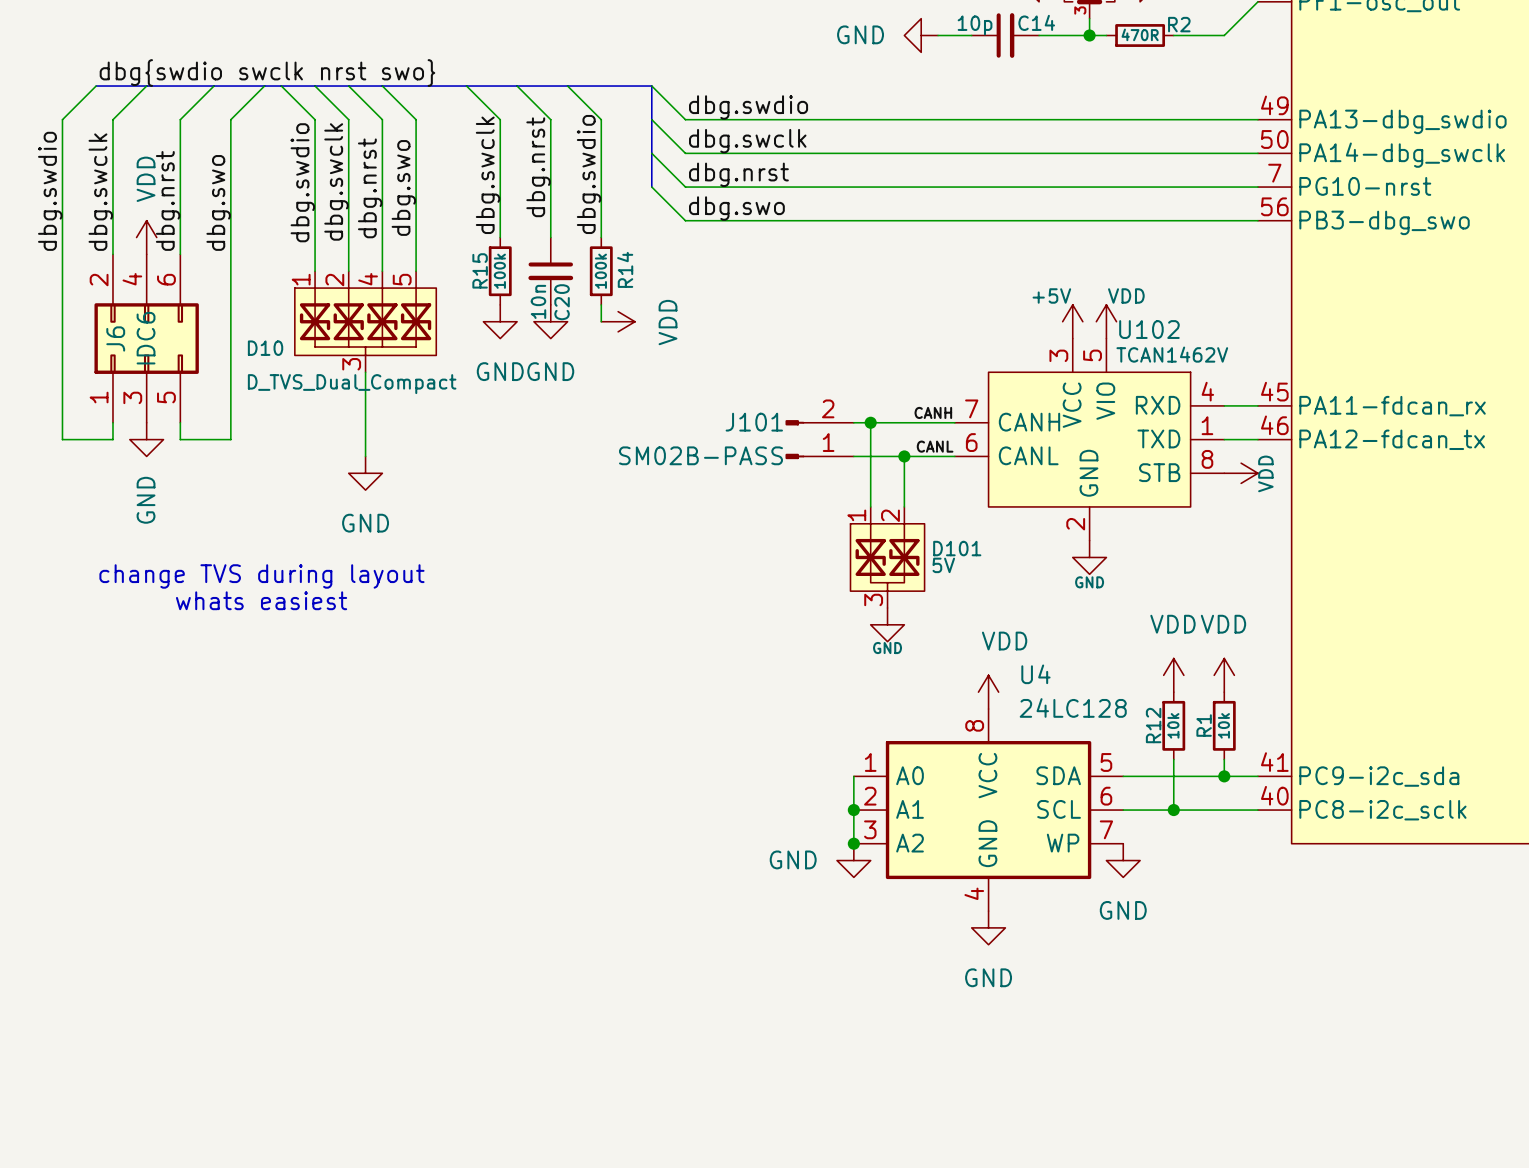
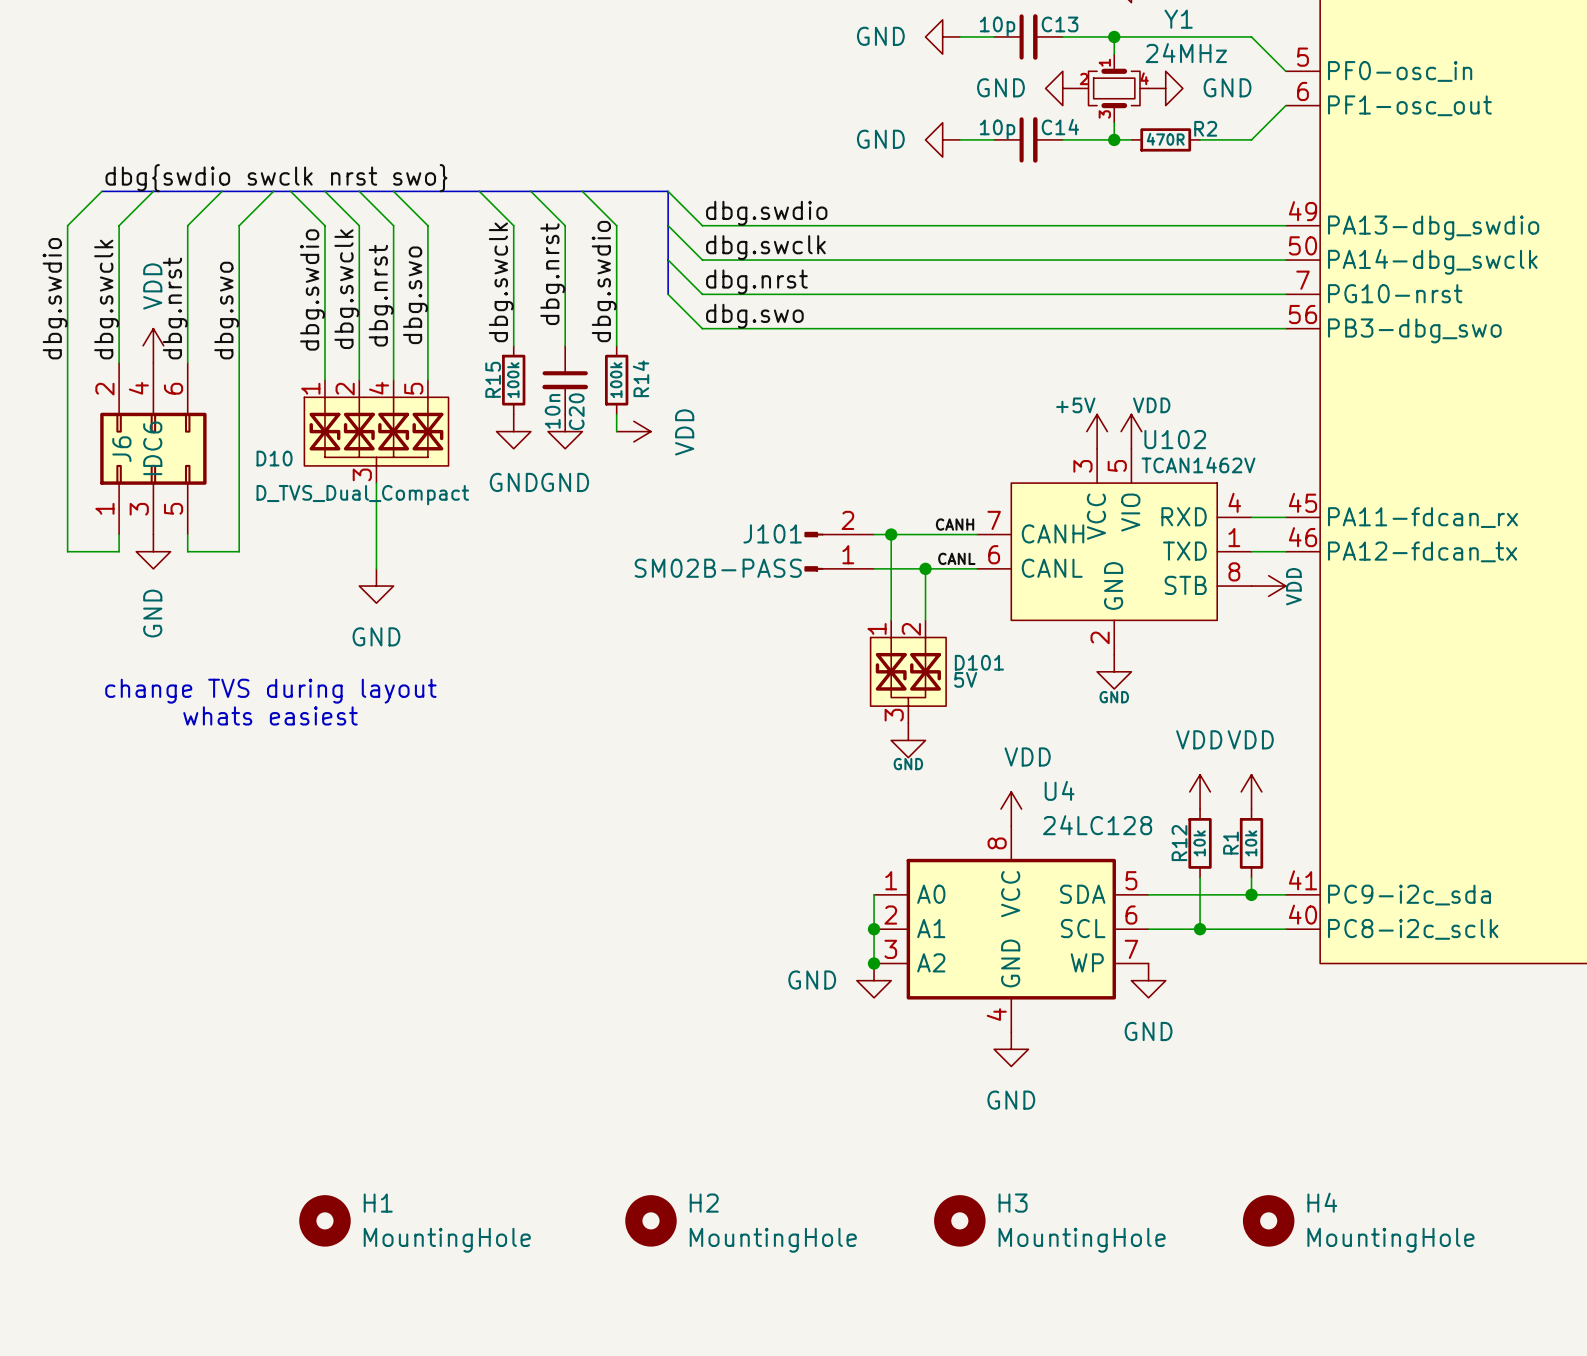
H1: none -> MountingHole (324, 1220)
H2: none -> MountingHole (650, 1220)
H3: none -> MountingHole (959, 1220)
H4: none -> MountingHole (1268, 1220)

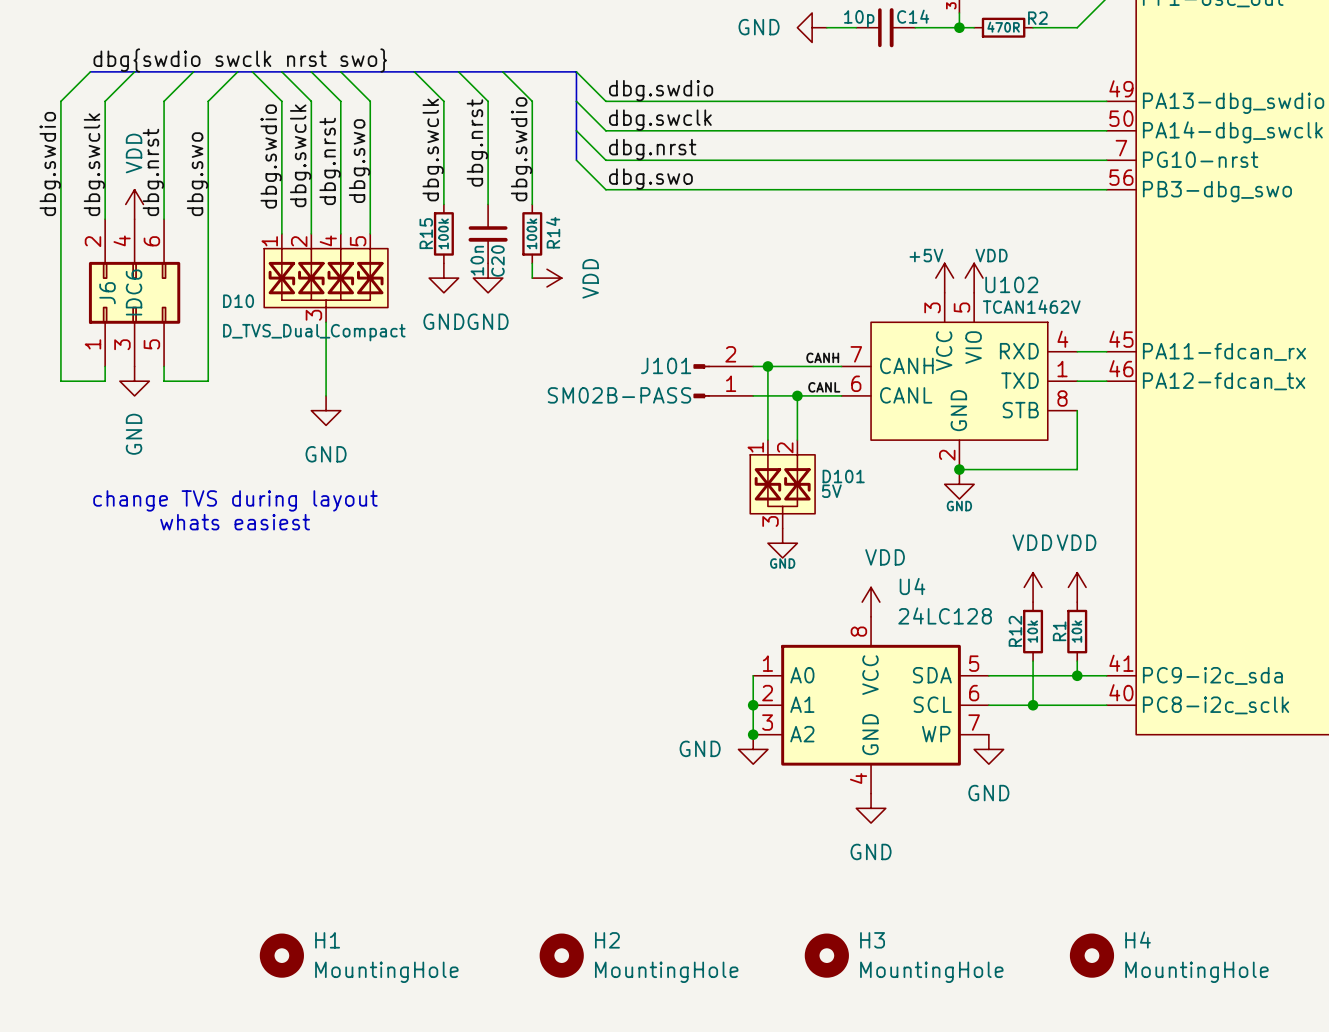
wire: none -> (1077, 410) (1077, 469) (959, 469)
power symbol: VDD (1268, 586) -> none
junction: none -> (959, 469)

